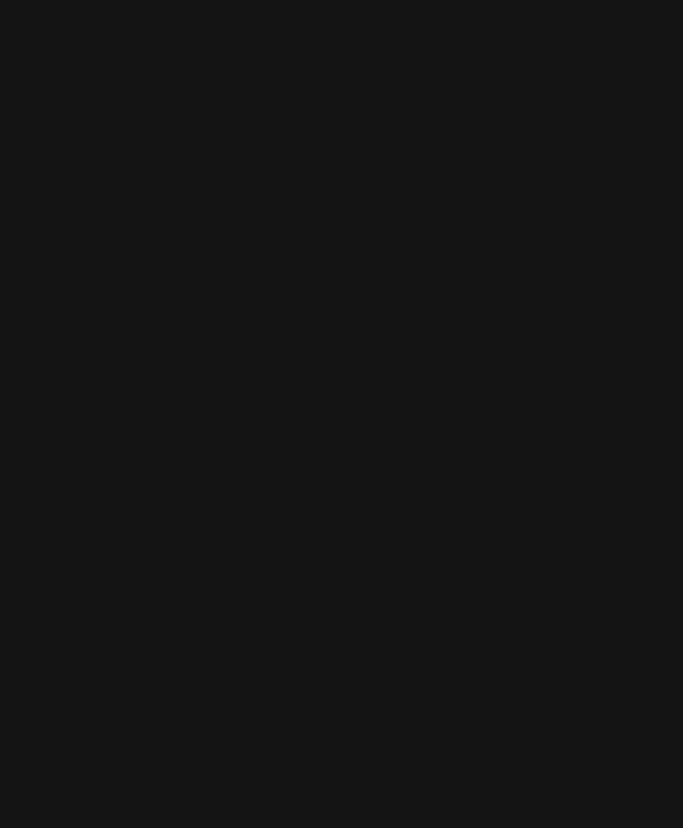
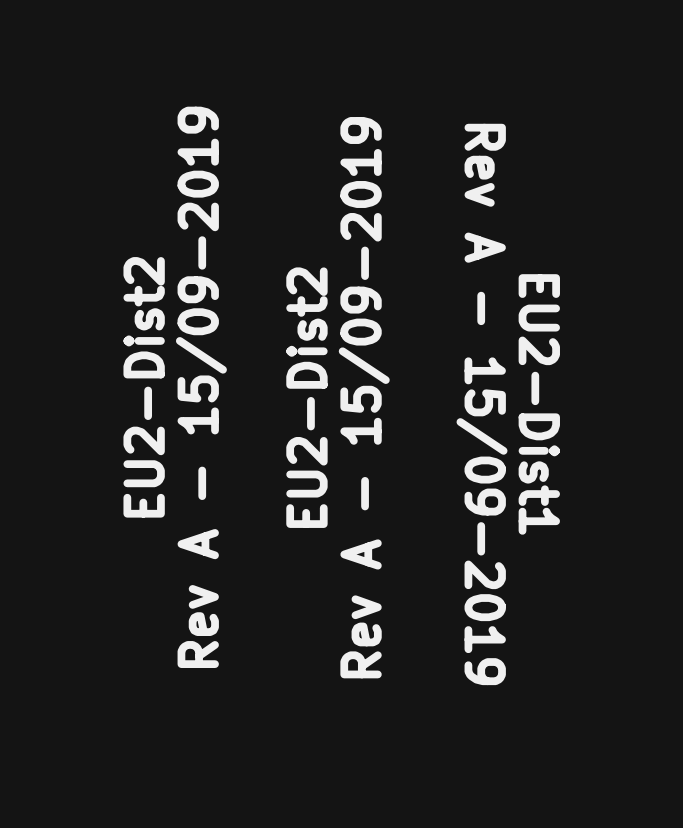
text: none -> EU2-Dist2 (144, 387)
text: none -> Rev A - 15/09-2019 (201, 387)
text: none -> EU2-Dist2 (306, 397)
text: none -> Rev A - 15/09-2019 (364, 397)
text: none -> Rev A - 15/09-2019 (482, 404)
text: none -> EU2-Dist1 (539, 404)

